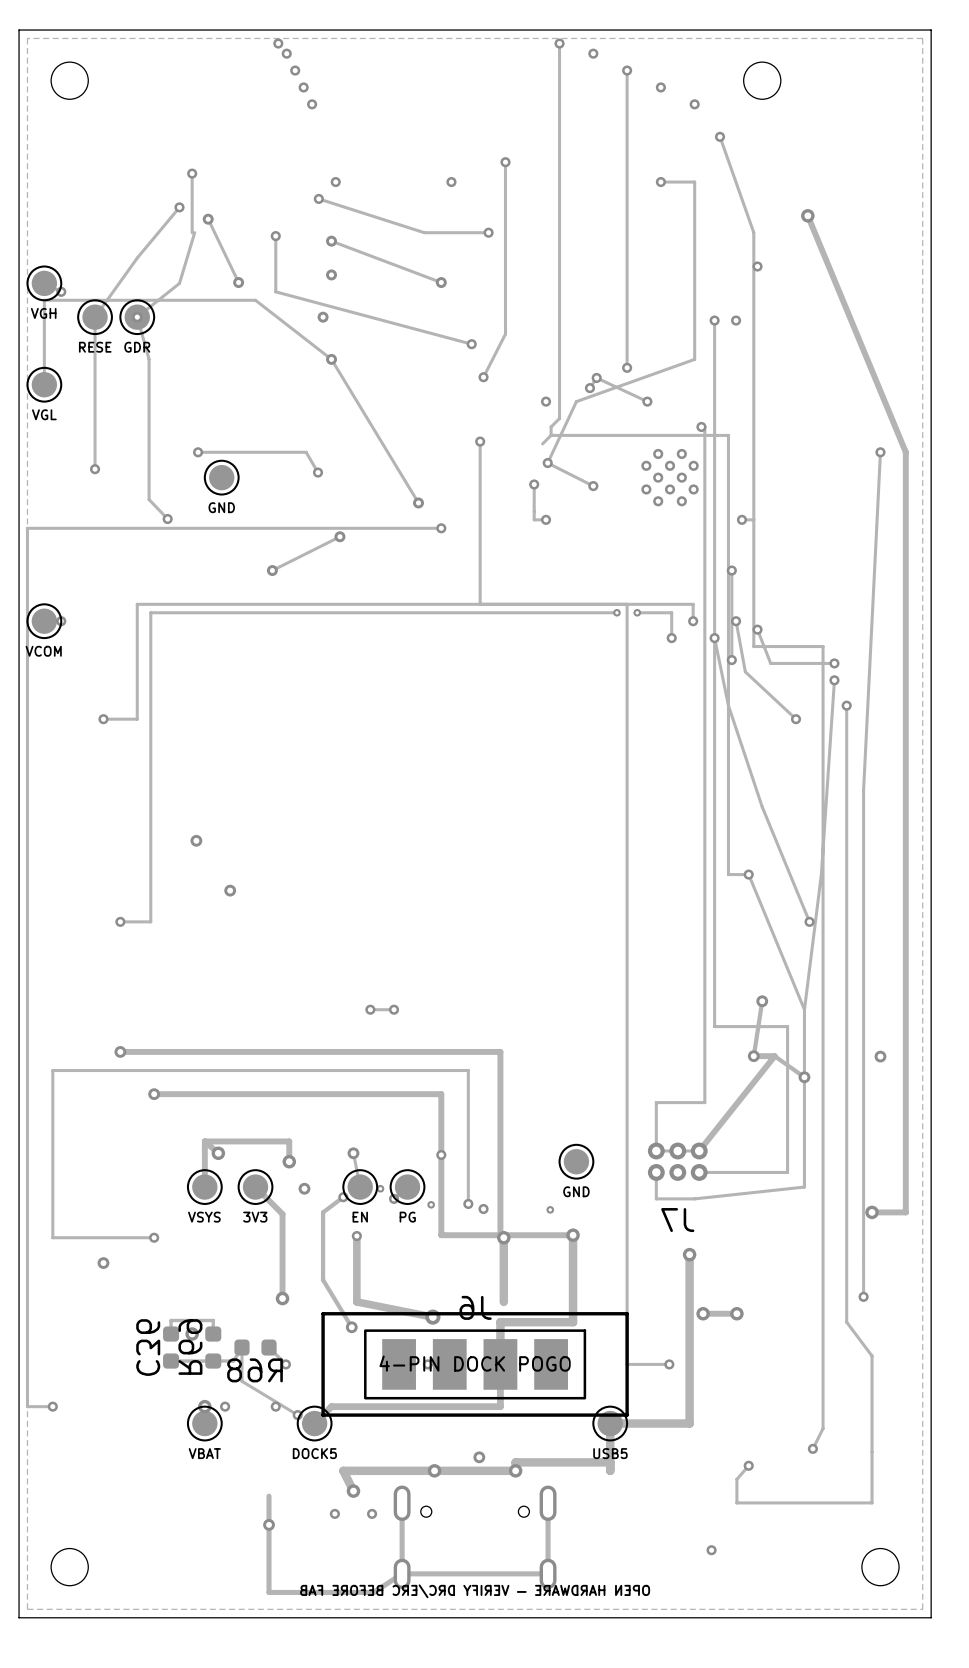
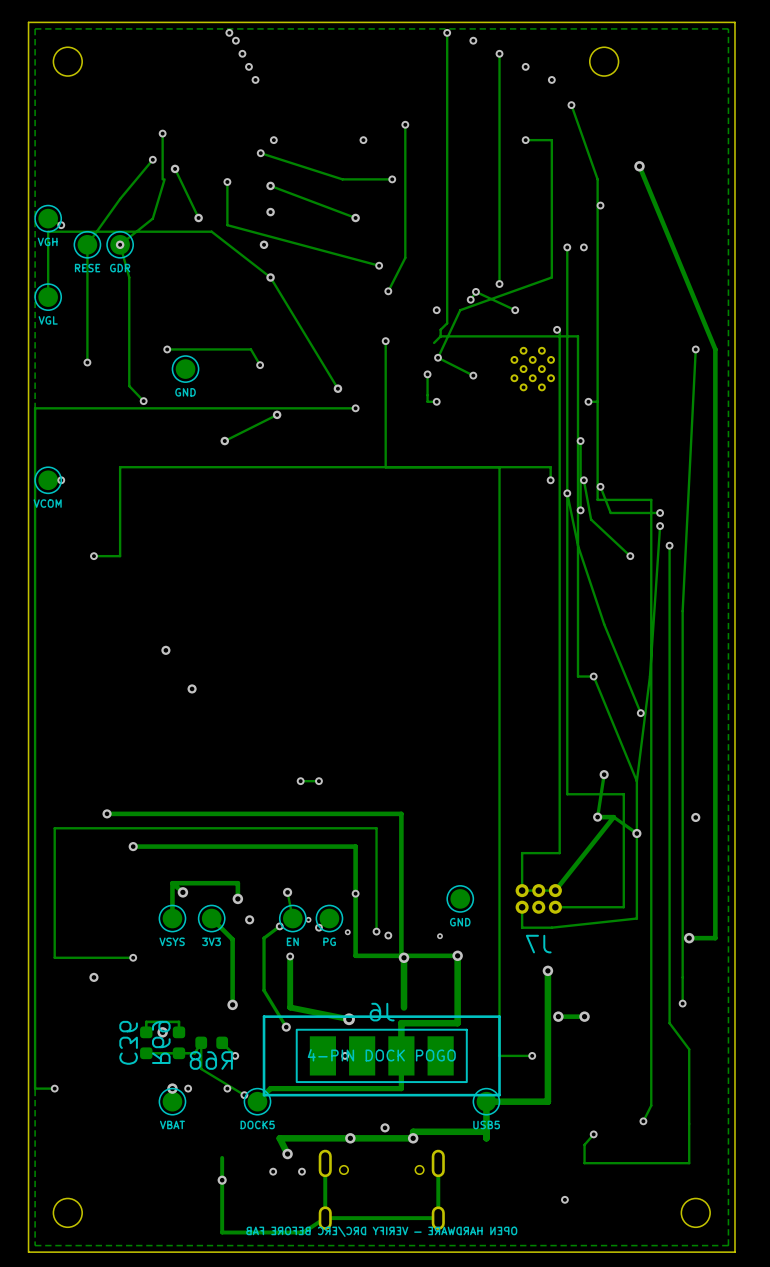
track: (616, 612) (150, 612) (150, 921) (120, 921) -> none
via: (616, 612) -> none
track: (637, 612) (671, 612) (671, 638) -> none
via: (637, 612) -> none
via: (671, 638) -> none
via: (120, 921) -> none

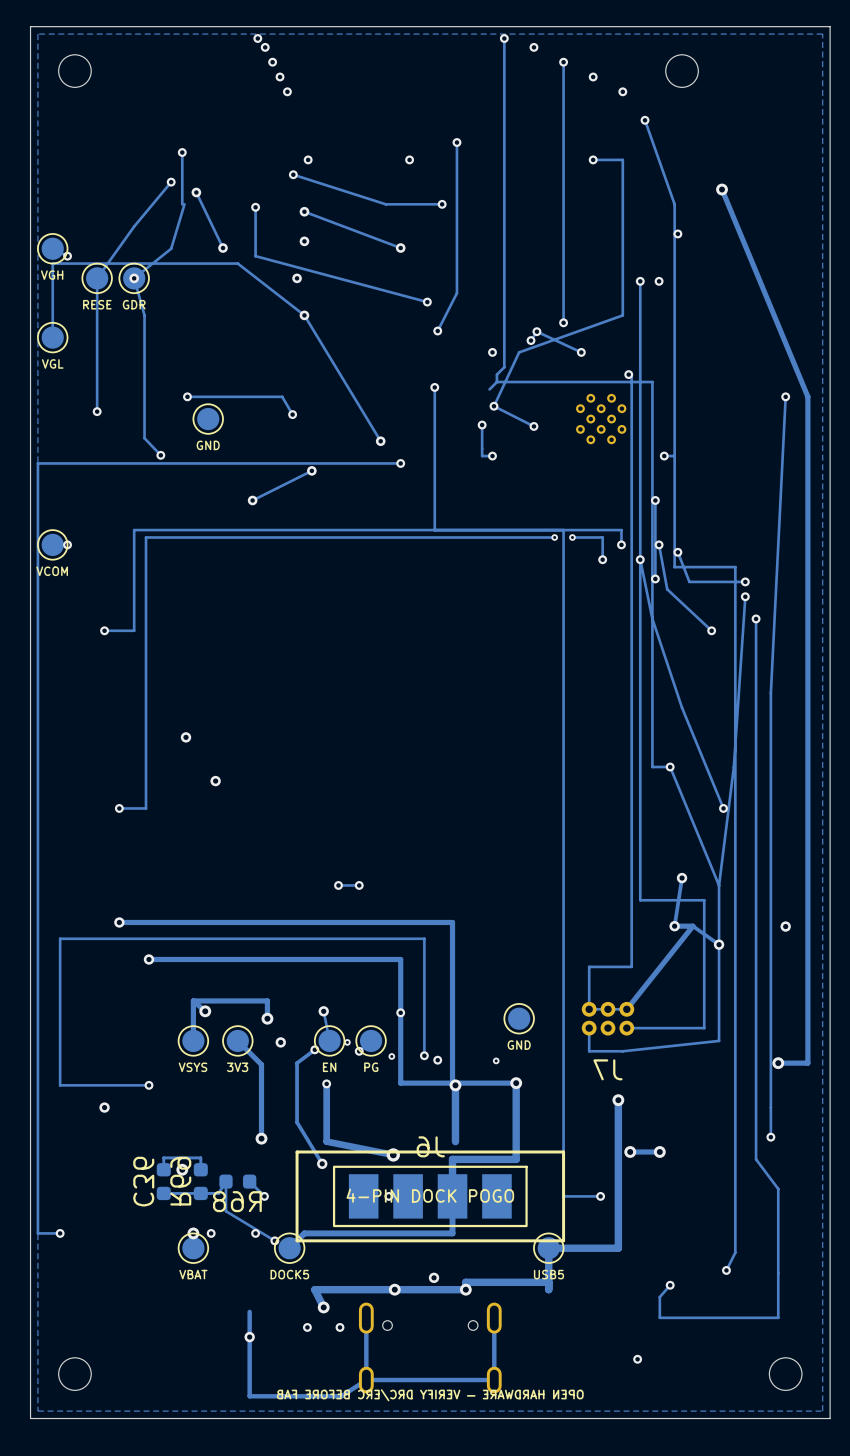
track: none -> (554, 537) (146, 537) (146, 808) (119, 808)
via: none -> (554, 537)
track: none -> (572, 537) (602, 537) (602, 559)
via: none -> (572, 537)
via: none -> (602, 559)
via: none -> (119, 808)

